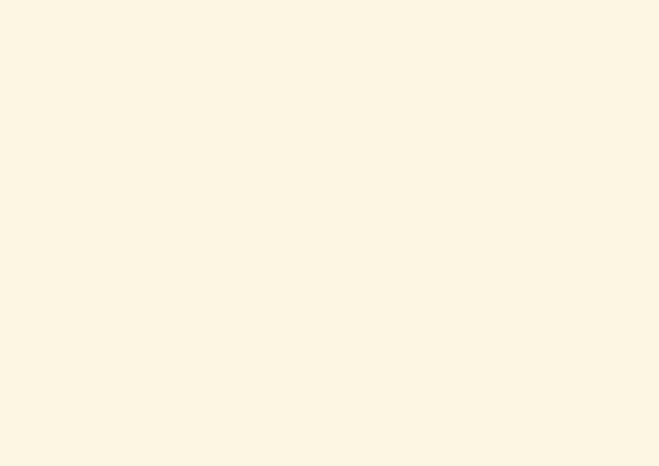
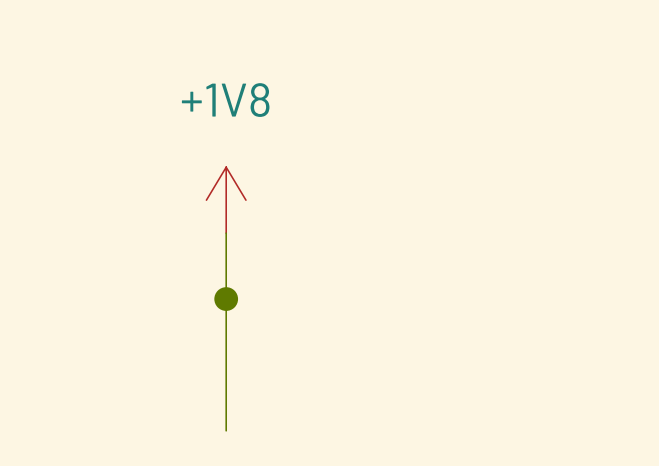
power symbol: none -> +1V8 (226, 200)
wire: none -> (226, 233) (226, 430)
junction: none -> (226, 299)

